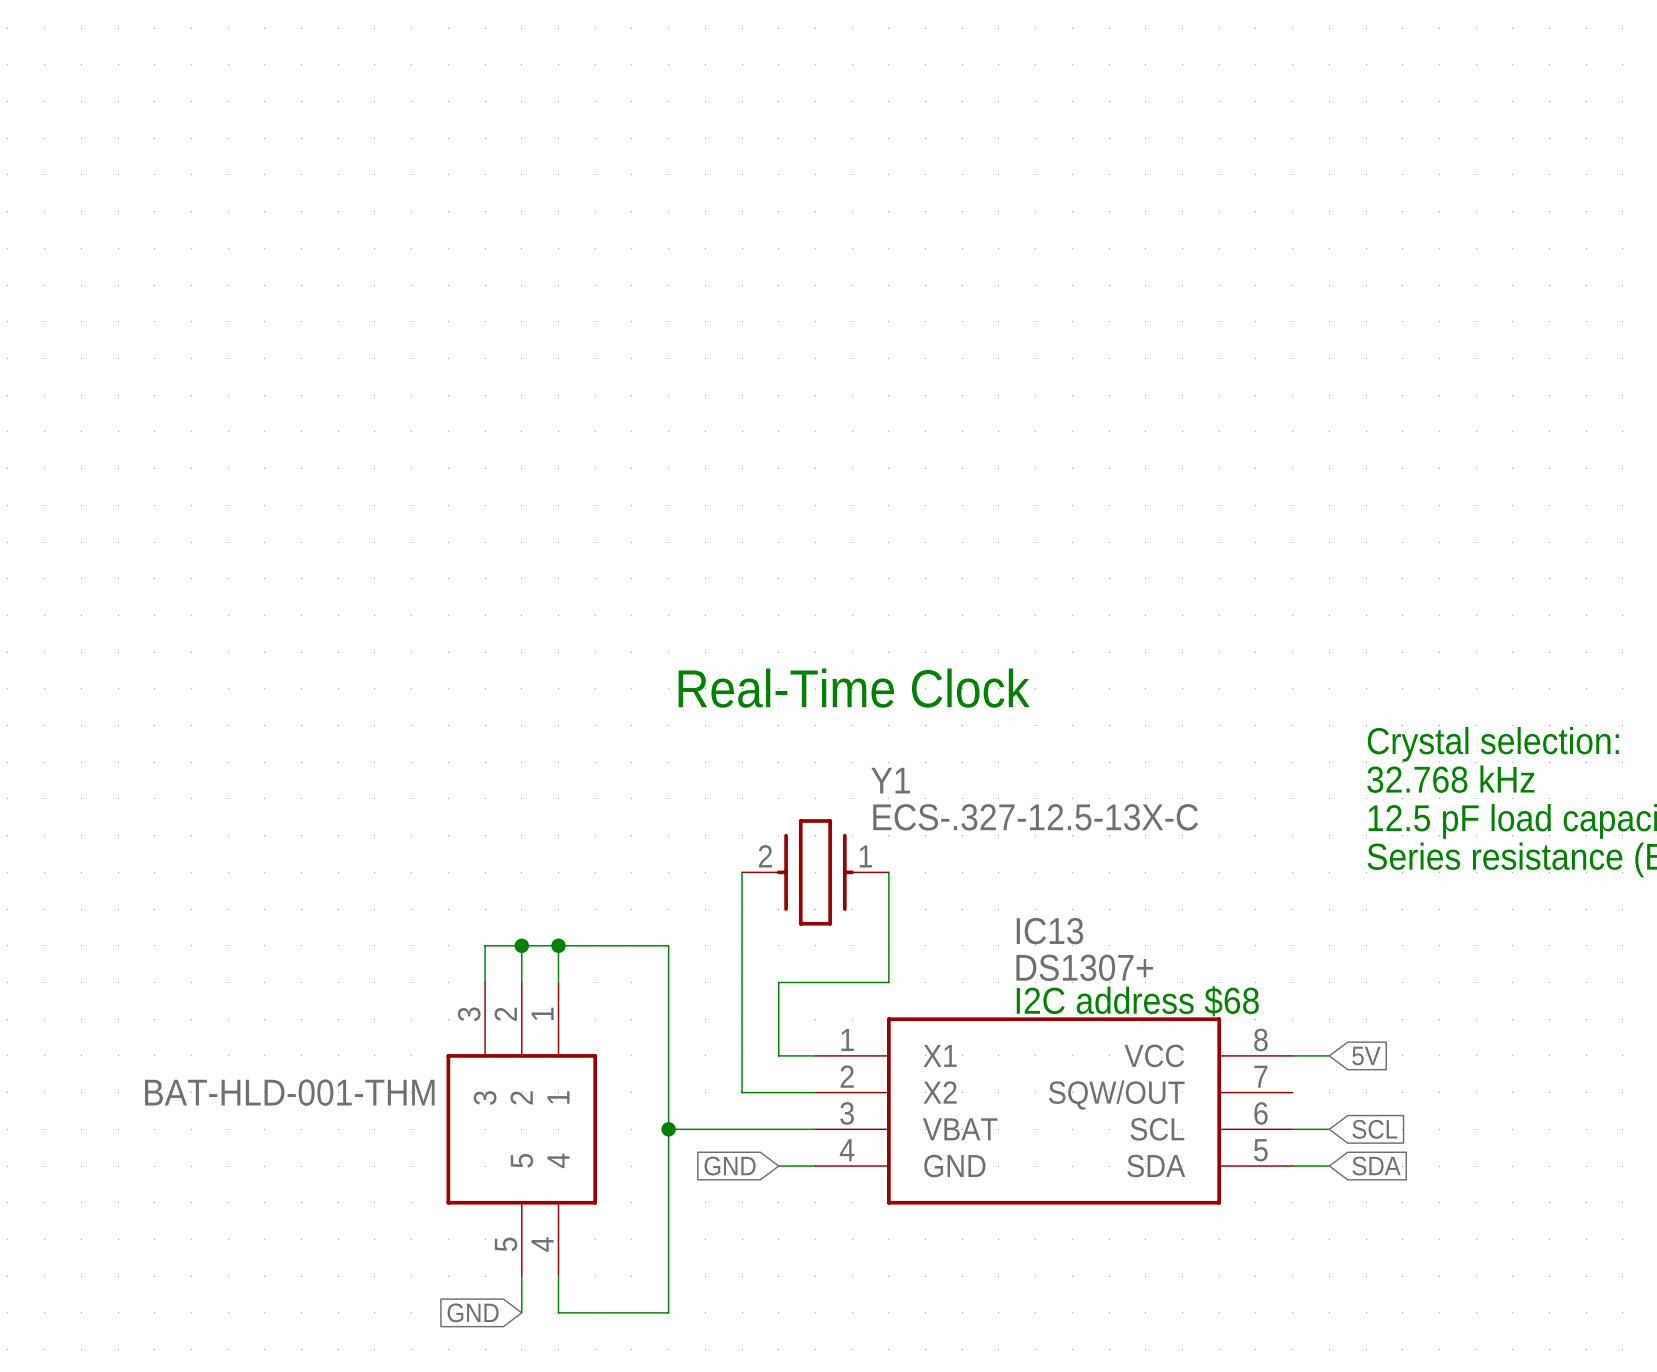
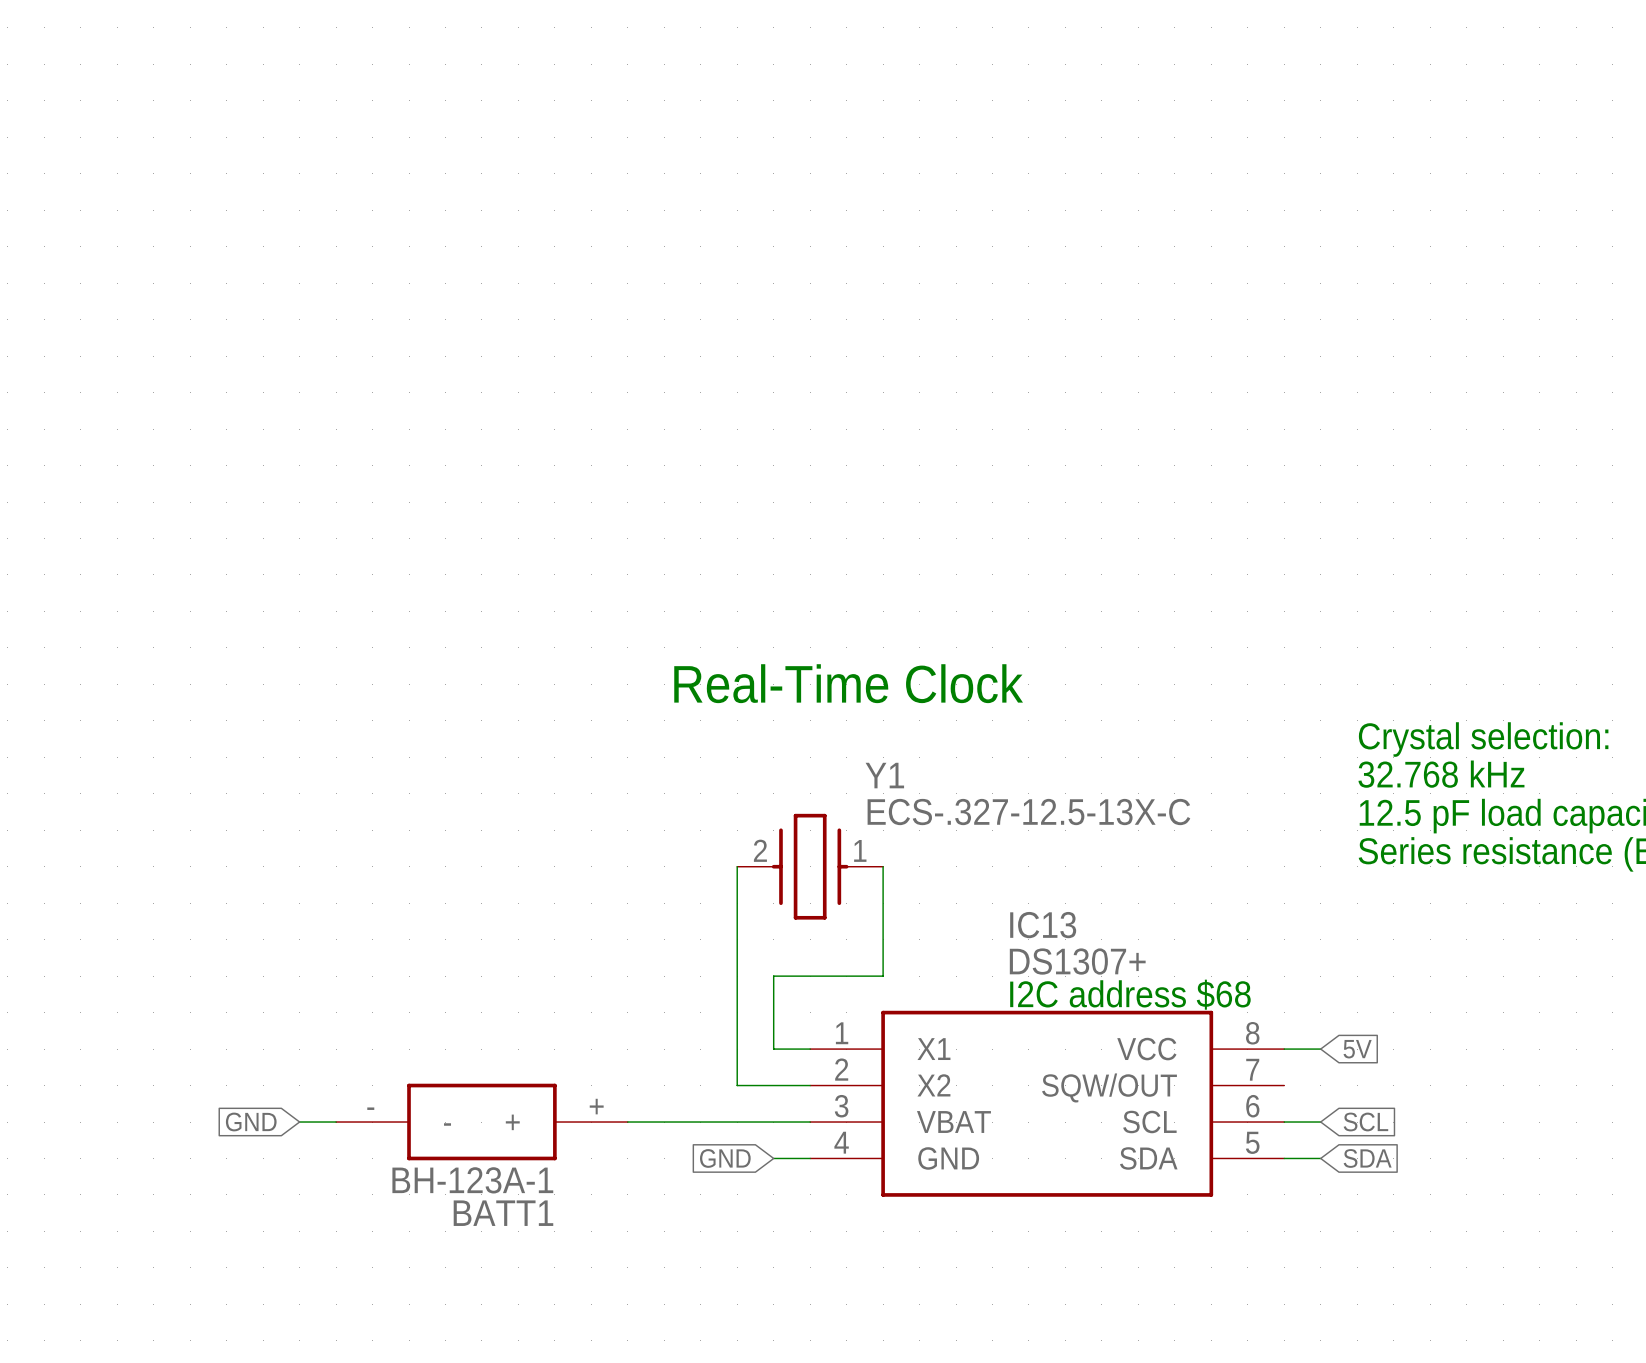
wire: (521, 945) (521, 982) -> none
junction: (521, 945) -> none
wire: (558, 945) (558, 982) -> none
junction: (558, 945) -> none
wire: (485, 982) (485, 945) (668, 945) (668, 1312) (558, 1312) (558, 1276) -> none
wire: none -> (299, 1122) (336, 1122)
BATT1: none -> BH-123A-1 (481, 1122)
part: BAT-HLD-001-THM (521, 1129) -> none
wire: none -> (627, 1122) (664, 1122)
junction: (668, 1129) -> none
wire: (521, 1276) (521, 1312) -> none
global label position: GND (473, 1312) -> GND (251, 1122)

